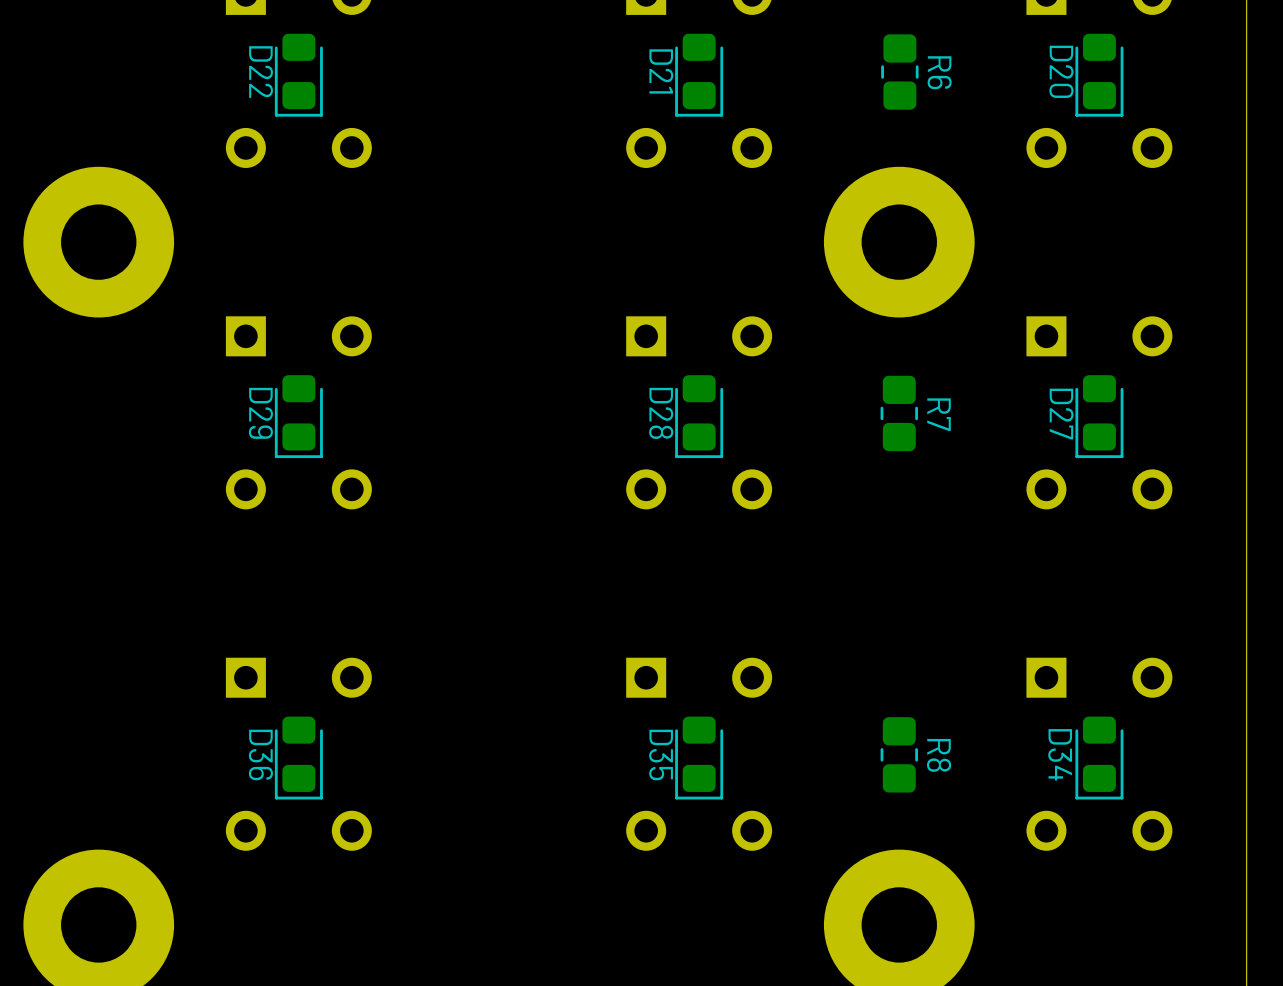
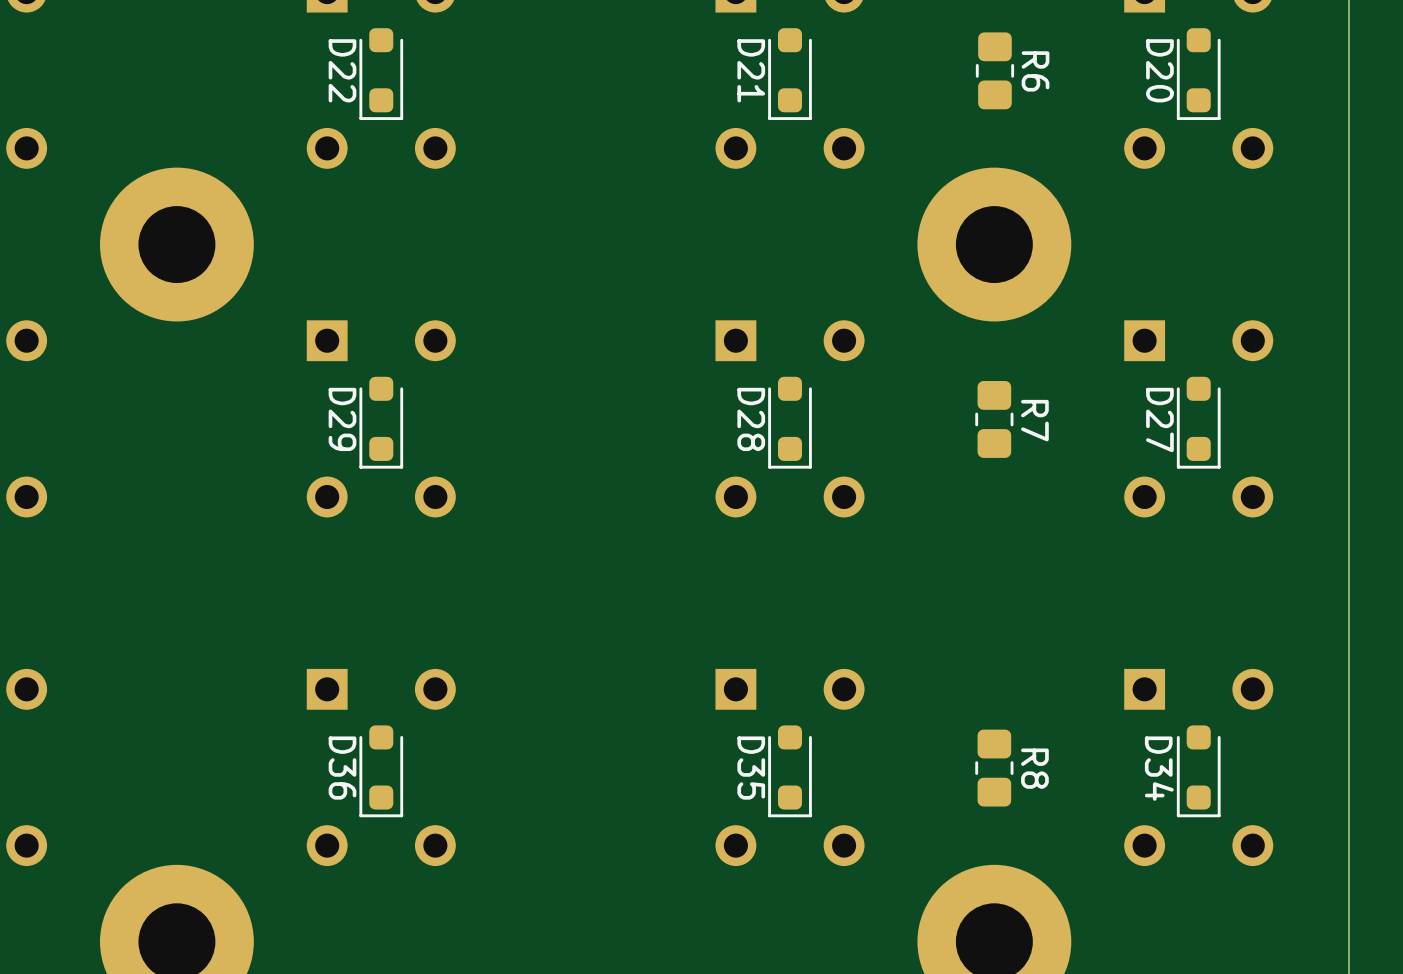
D22 footprint: [274, 33, 323, 117] -> [359, 28, 404, 121]
D21 footprint: [675, 33, 724, 117] -> [768, 28, 812, 121]
D20 footprint: [1075, 33, 1124, 117] -> [1176, 28, 1221, 121]
D29 footprint: [274, 375, 323, 459] -> [359, 376, 404, 469]
D28 footprint: [675, 375, 724, 459] -> [768, 376, 812, 469]
D27 footprint: [1075, 375, 1124, 459] -> [1176, 376, 1221, 469]
D36 footprint: [274, 716, 323, 800] -> [359, 725, 404, 818]
D35 footprint: [675, 716, 724, 800] -> [768, 725, 812, 818]
D34 footprint: [1075, 716, 1124, 800] -> [1176, 725, 1221, 818]

